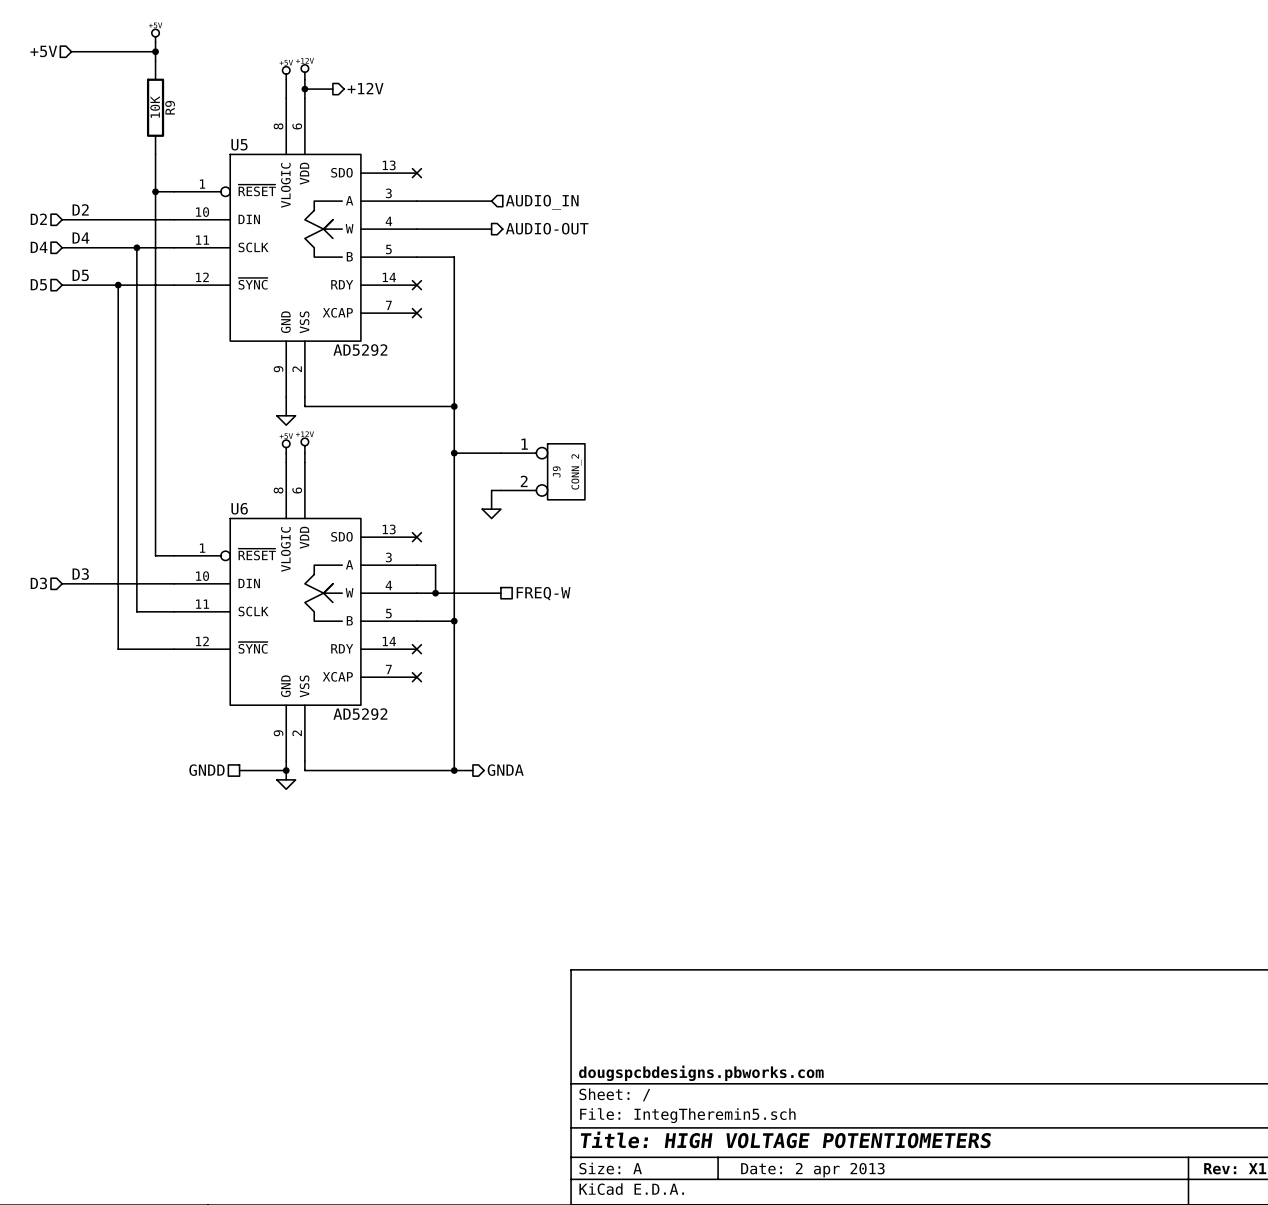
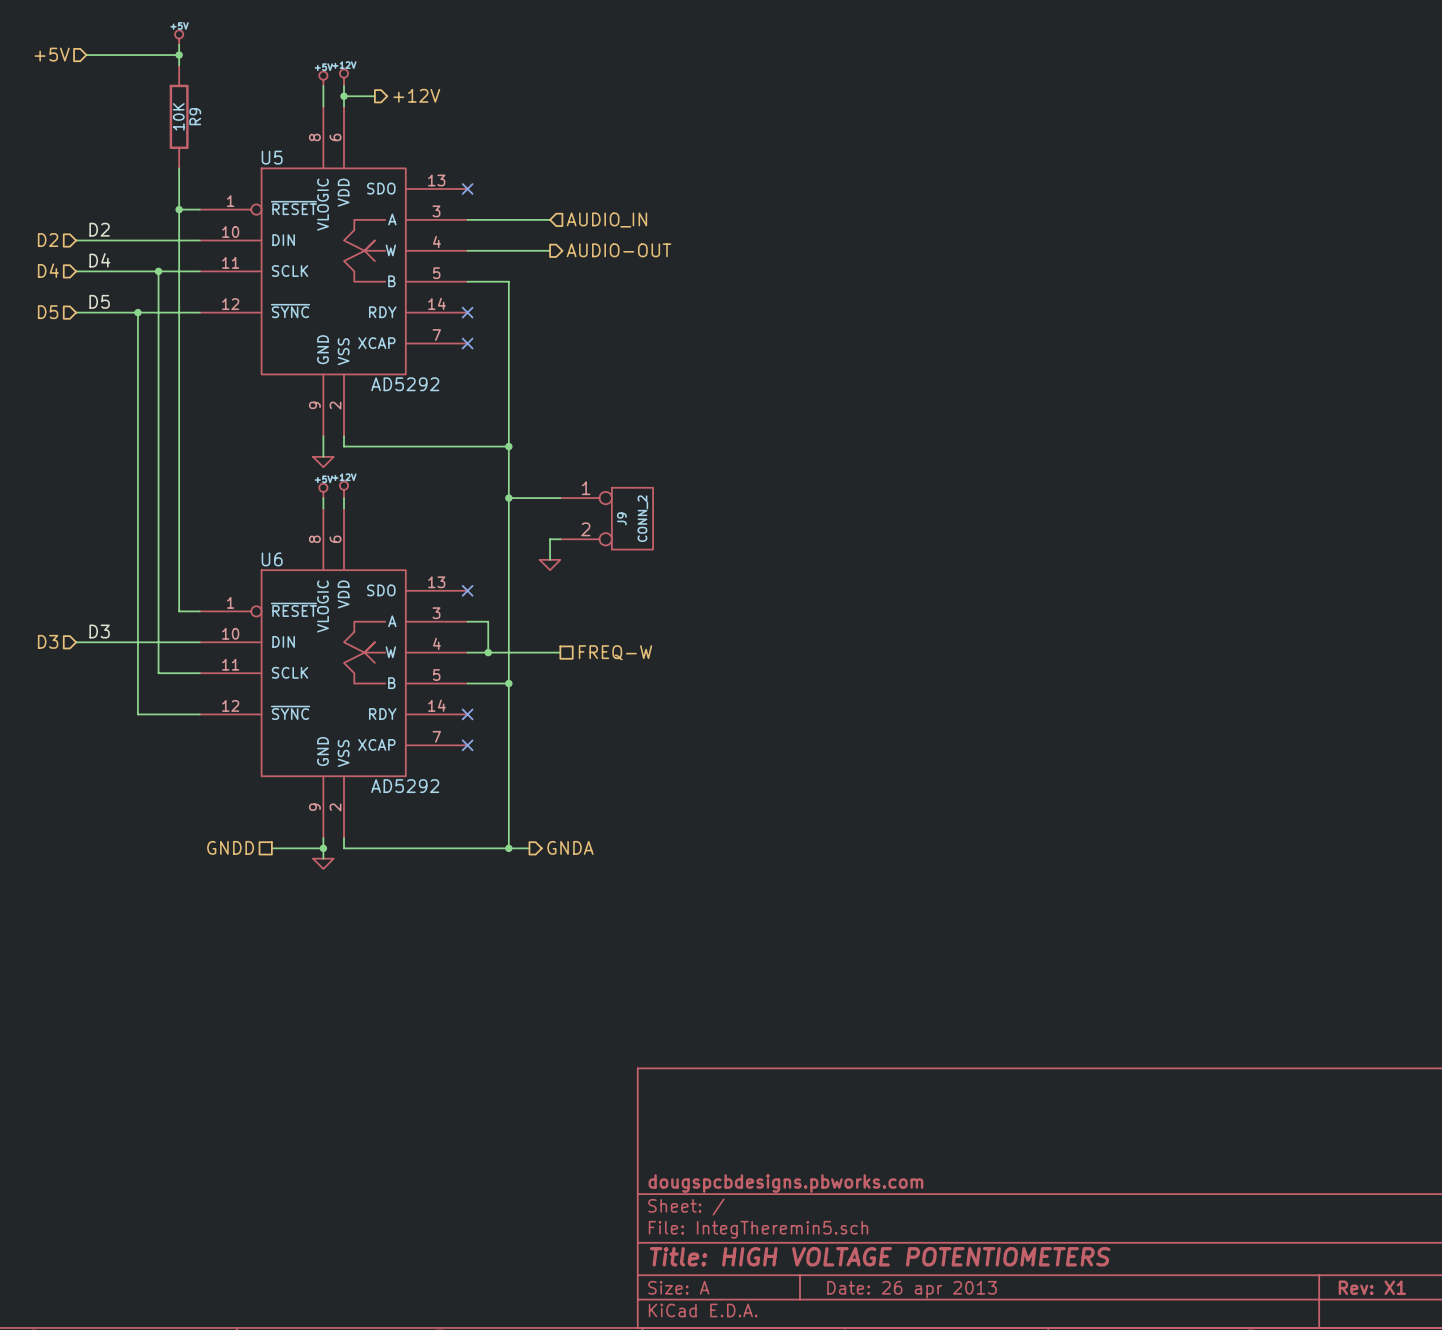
title block: Date: 2 apr 2013 (812, 1170) -> Date: 26 apr 2013 (912, 1289)

